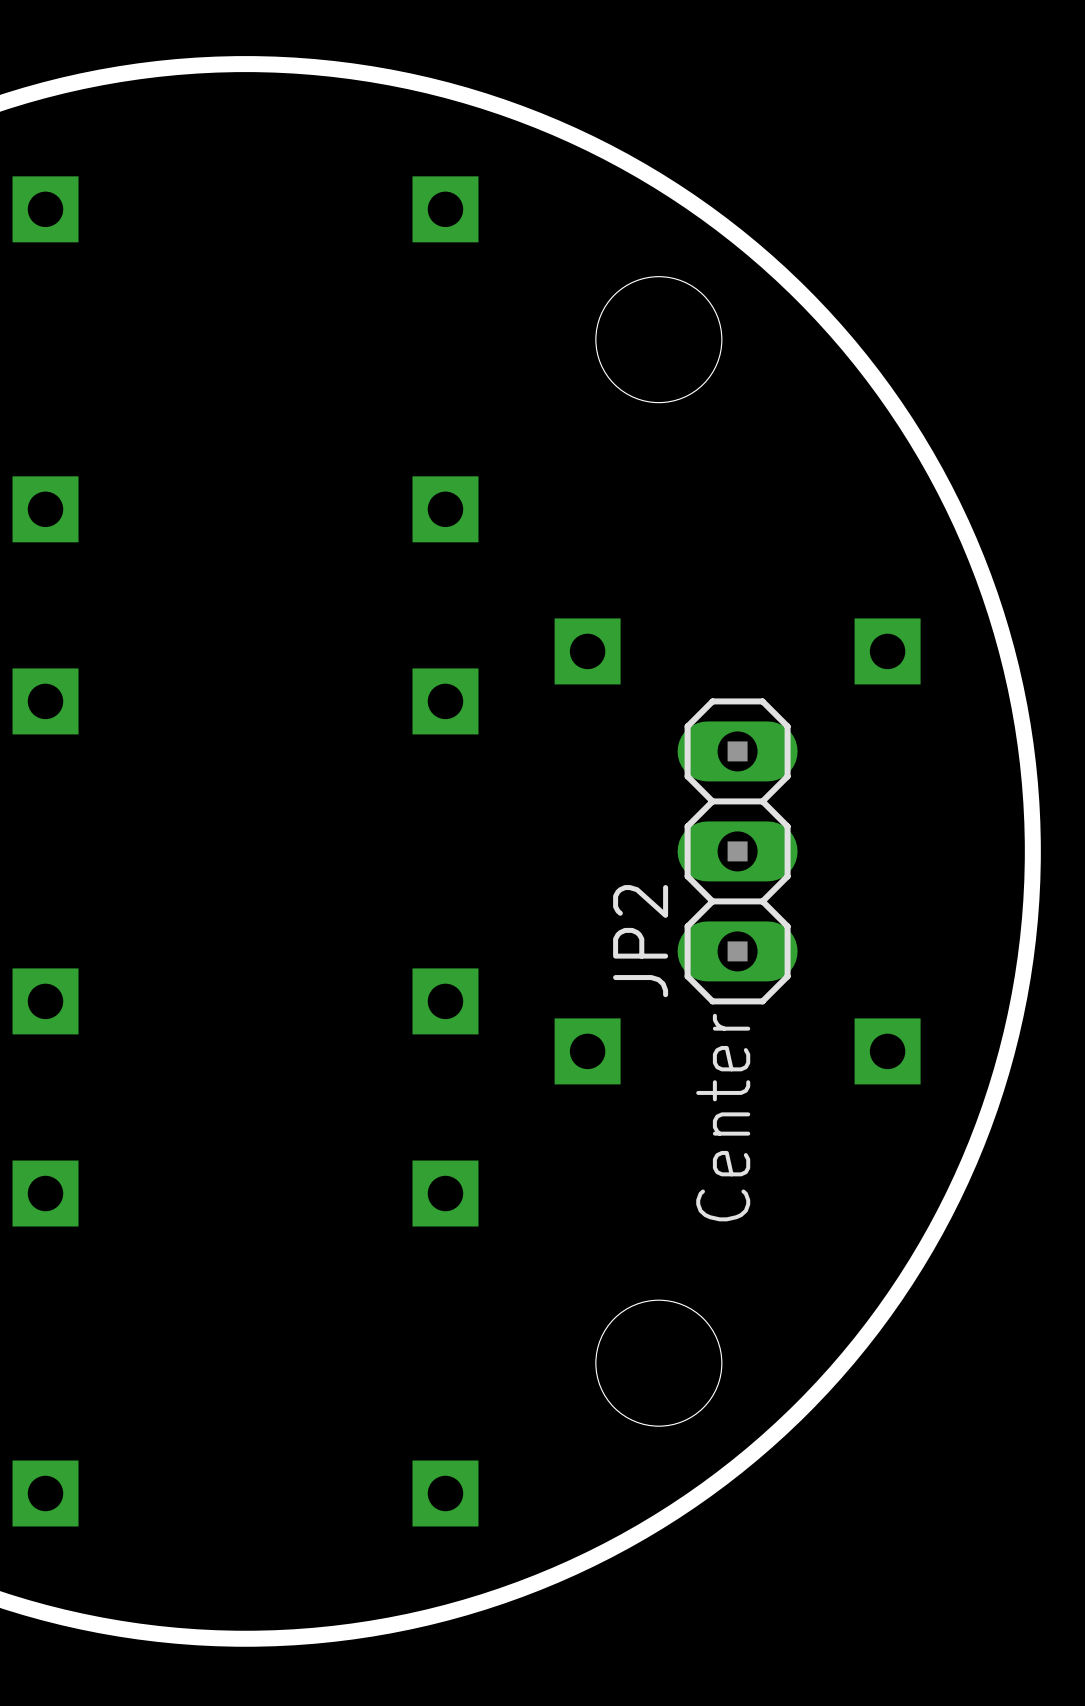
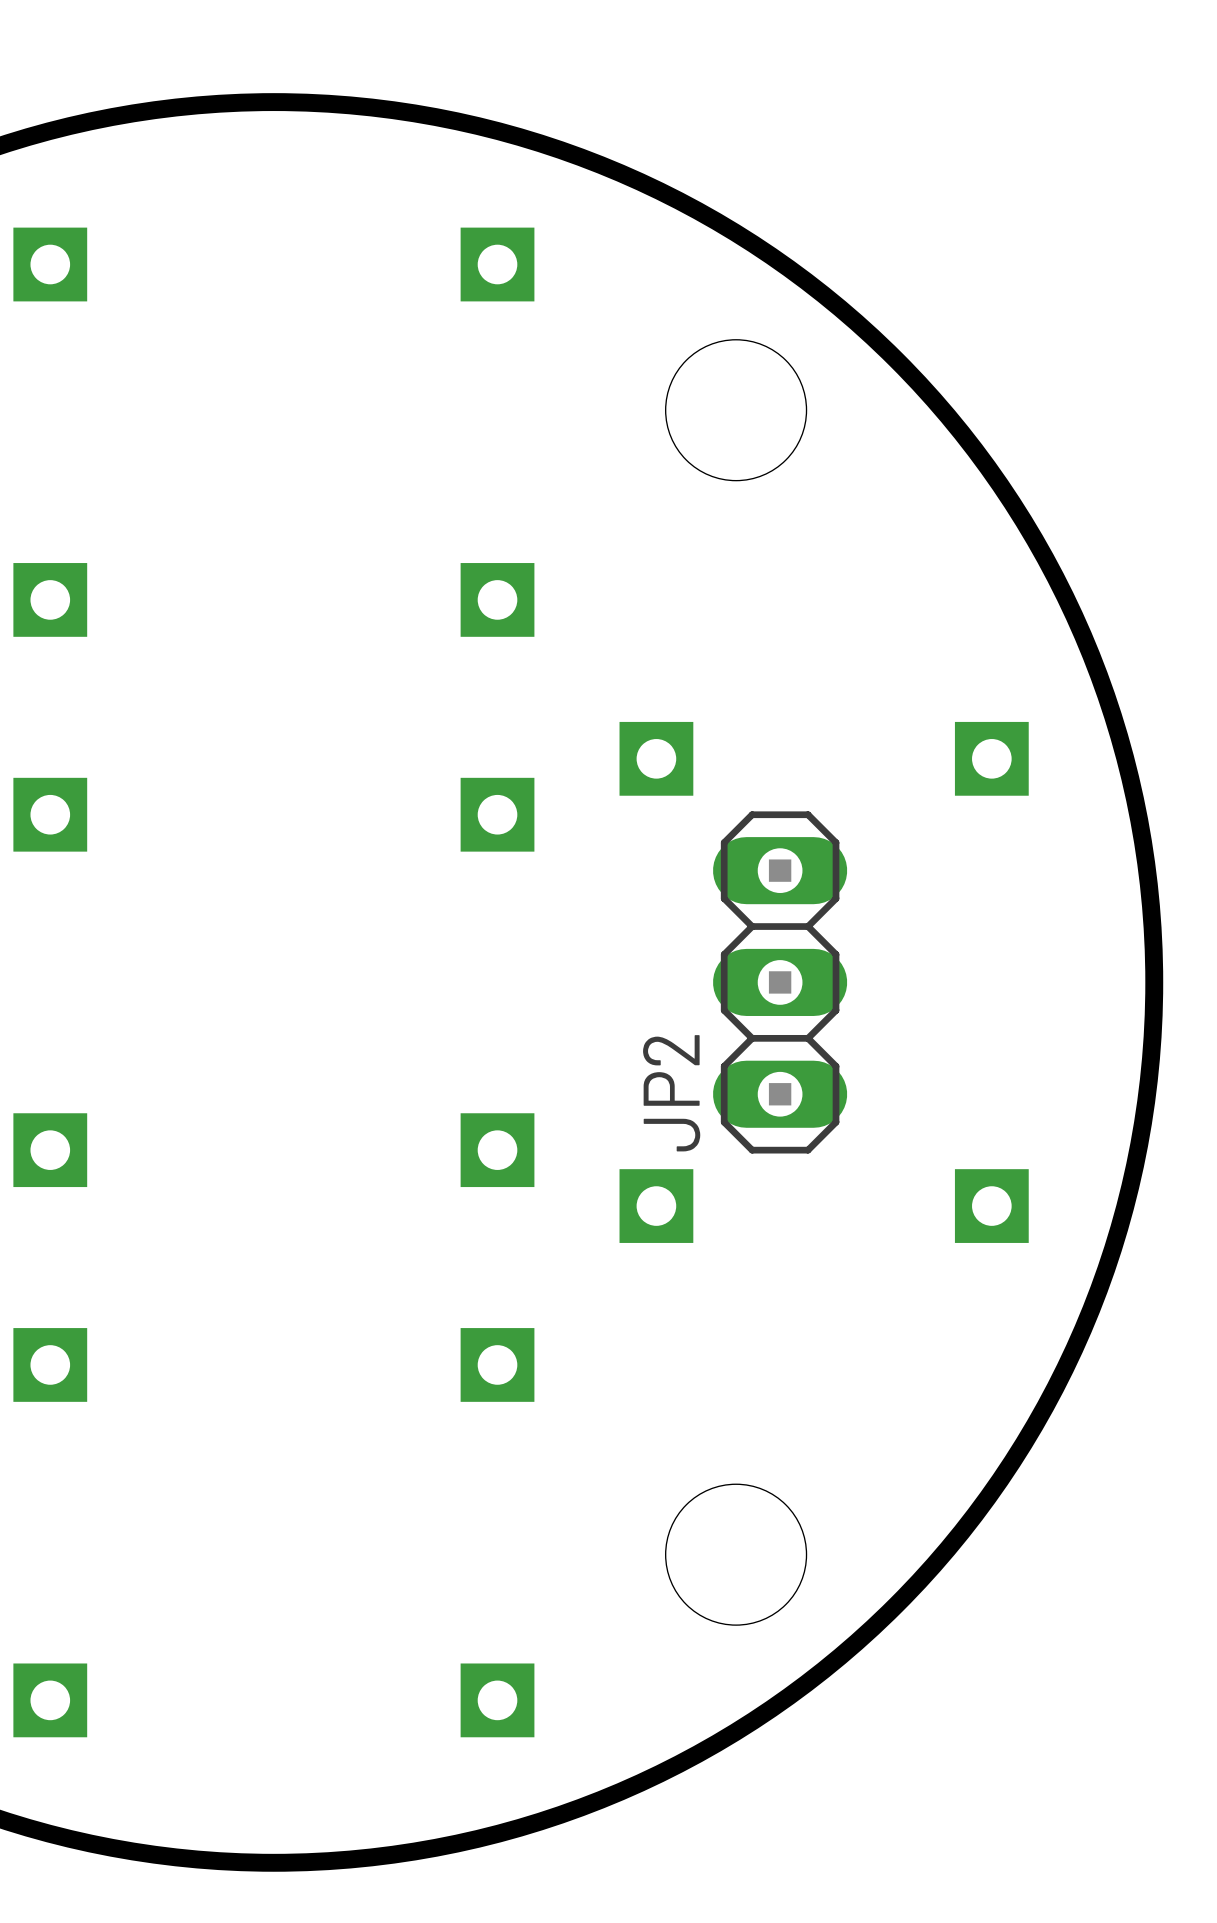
JP2 position: (737, 851) -> (780, 982)
text: Center (723, 1117) -> none

